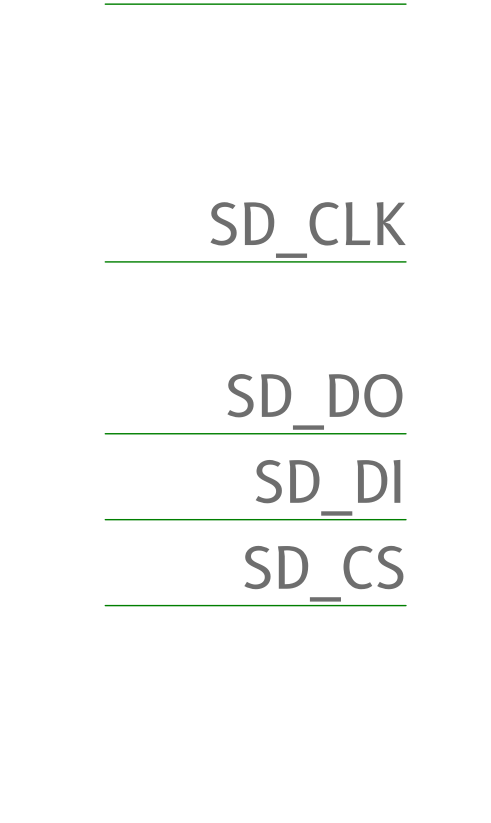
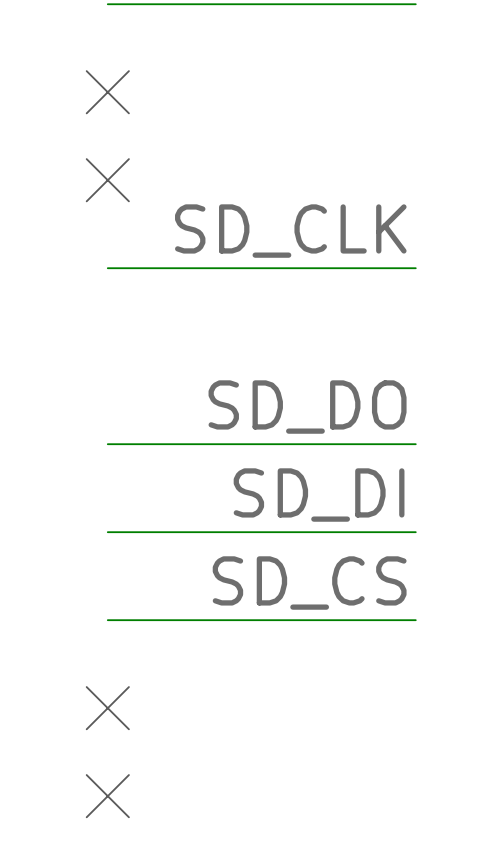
no-connect mark: none -> (107, 92)
no-connect mark: none -> (107, 180)
no-connect mark: none -> (107, 708)
no-connect mark: none -> (107, 796)

